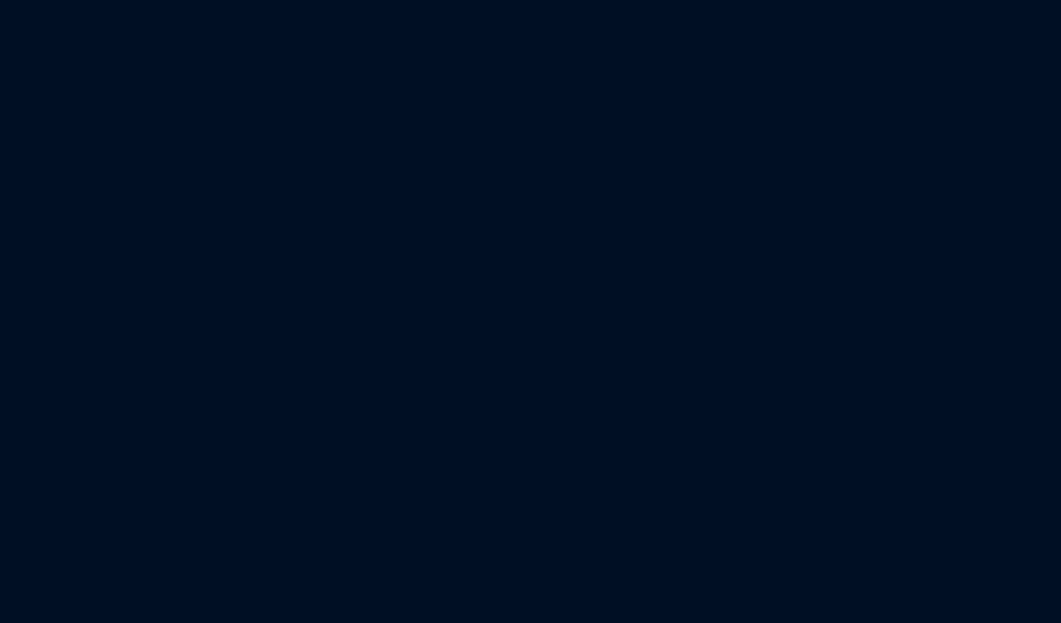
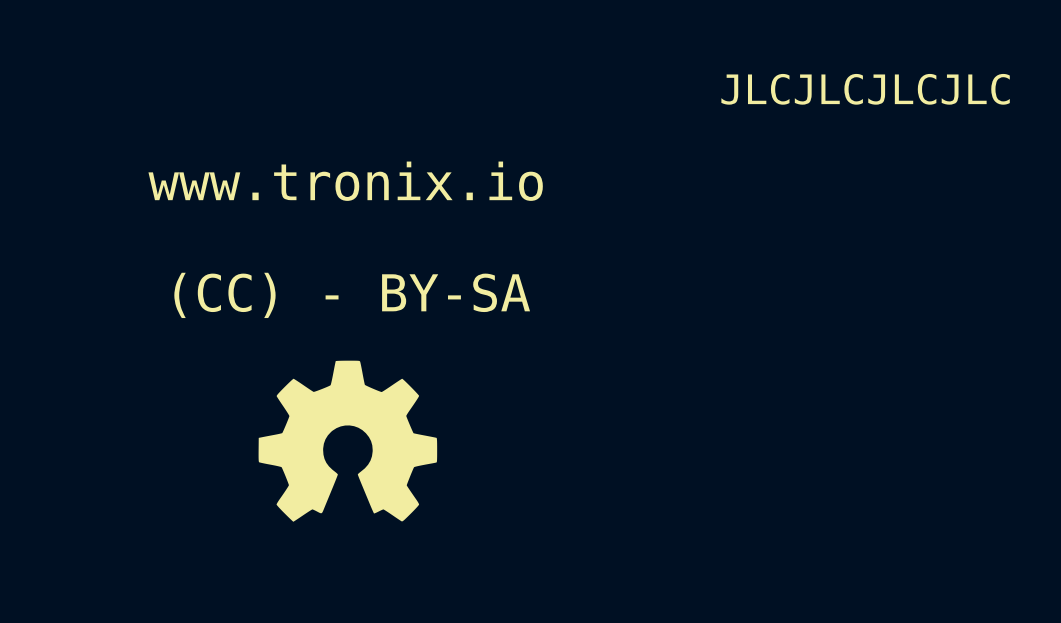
text: none -> JLCJLCJLCJLC (865, 89)
text: none -> www.tronix.io (345, 181)
text: none -> (CC) - BY-SA (352, 295)
drawing: none -> [258, 360, 438, 522]

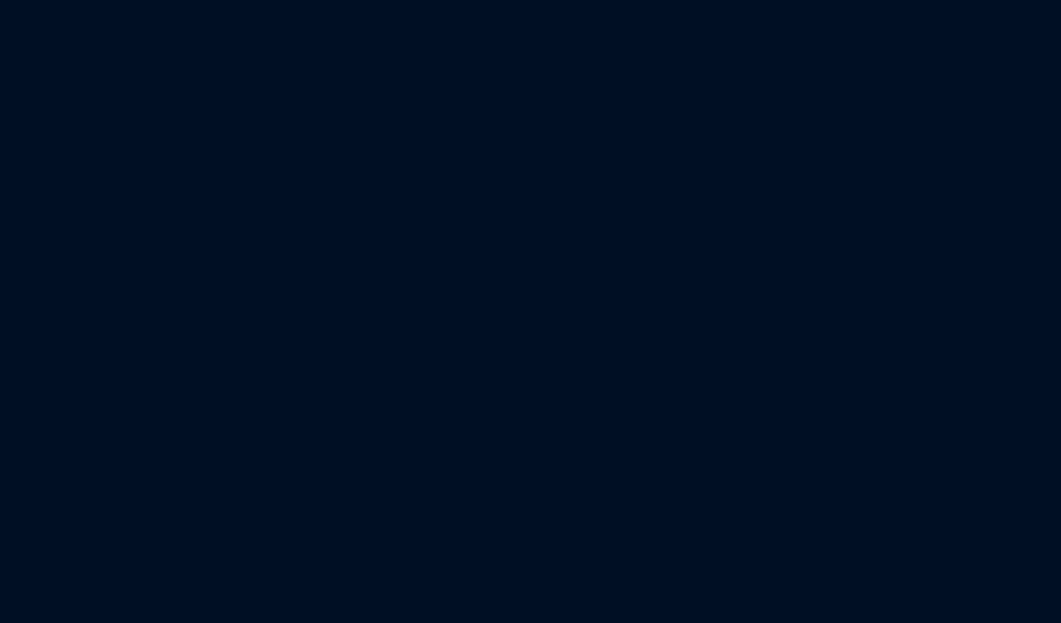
text: JLCJLCJLCJLC (865, 89) -> none
text: www.tronix.io (345, 181) -> none
text: (CC) - BY-SA (352, 295) -> none
drawing: [258, 360, 438, 522] -> none

